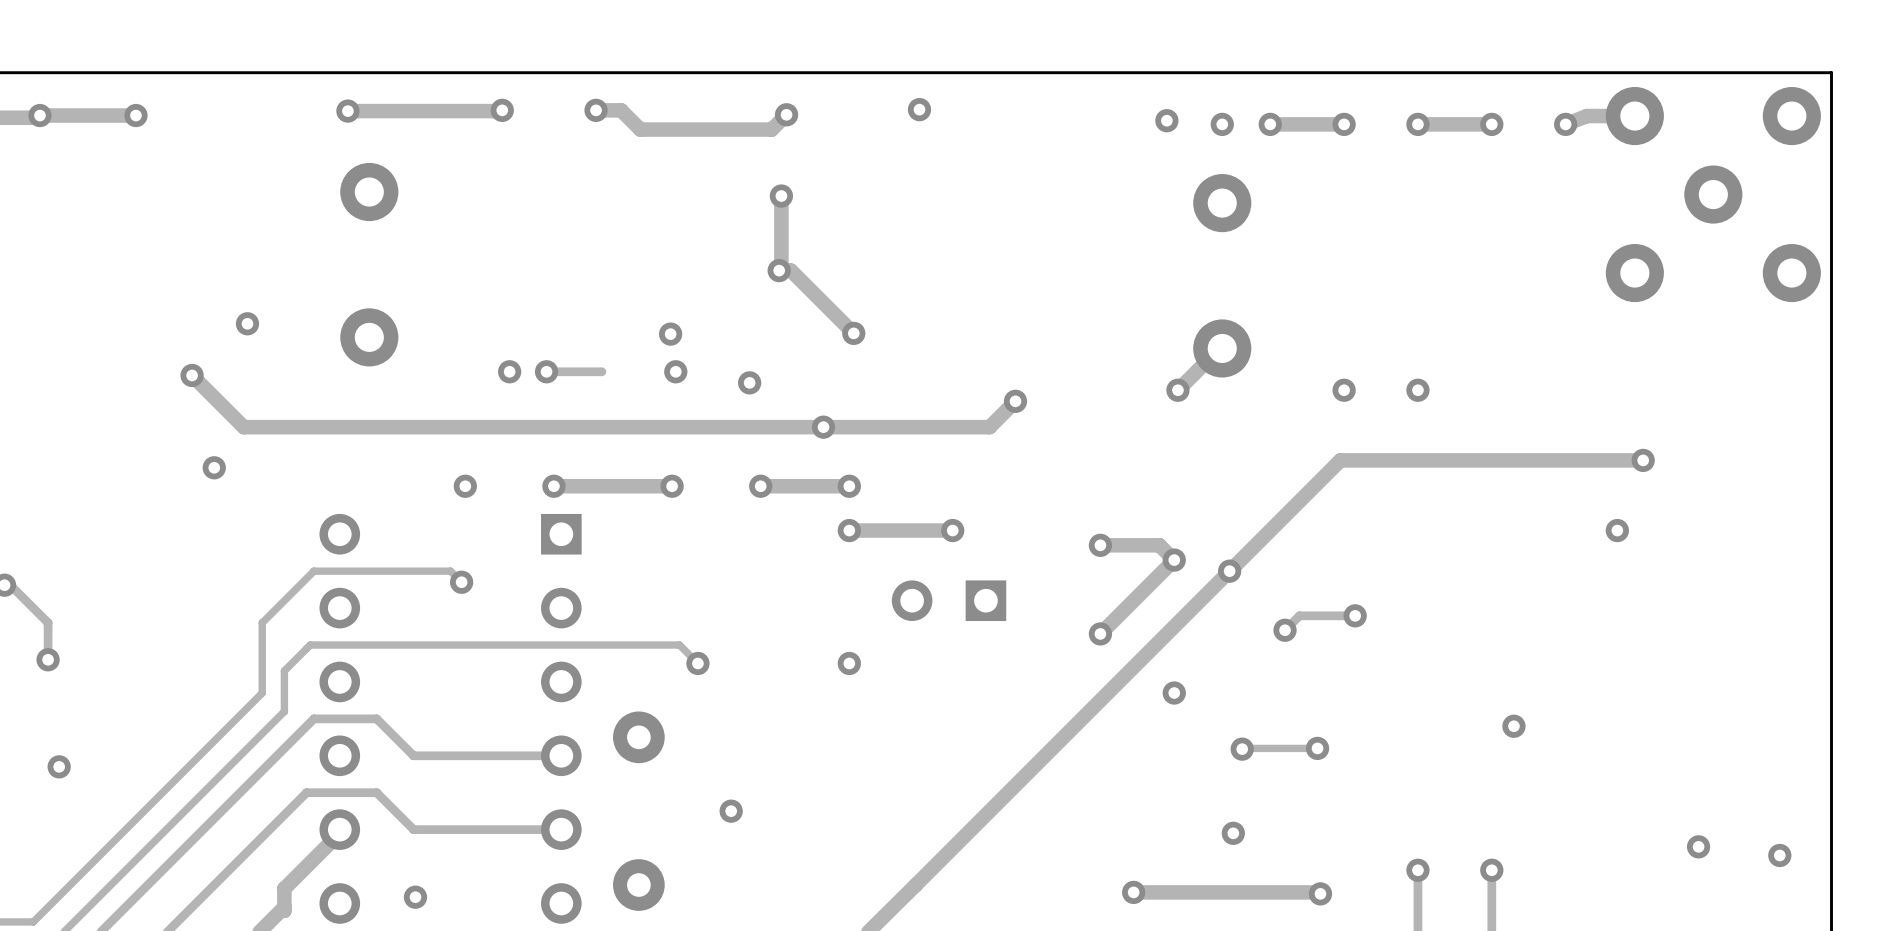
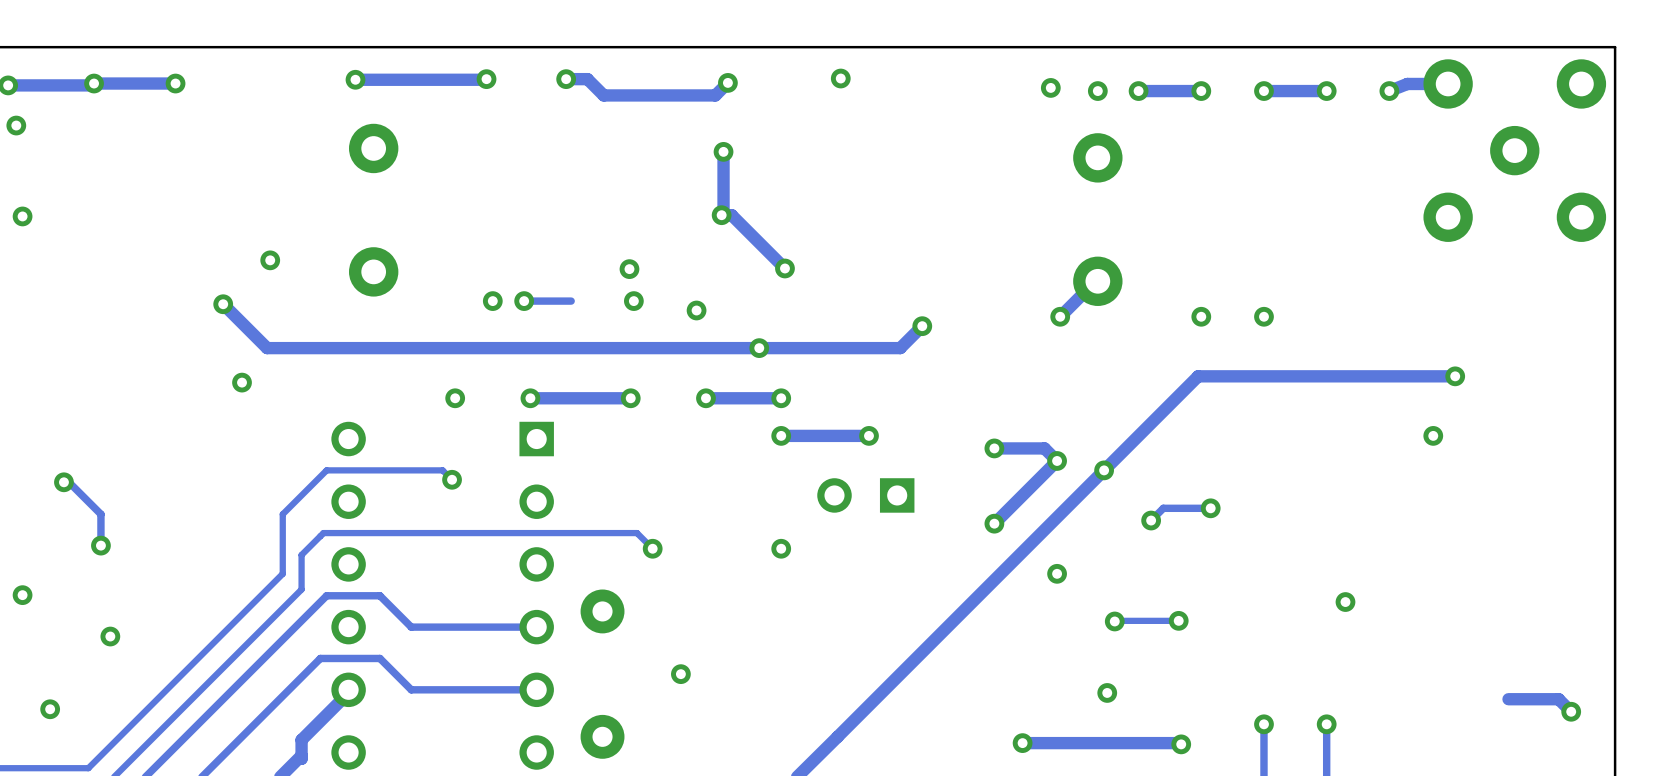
track: none -> (1508, 699) (1558, 699) (1571, 711)
via: (1698, 846) -> none
via: (415, 897) -> none

